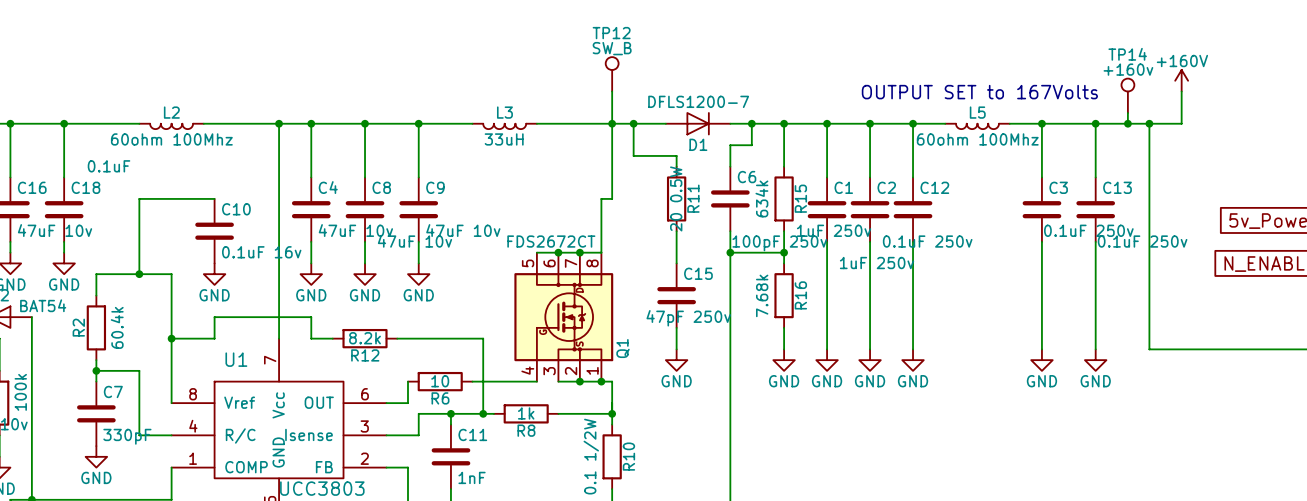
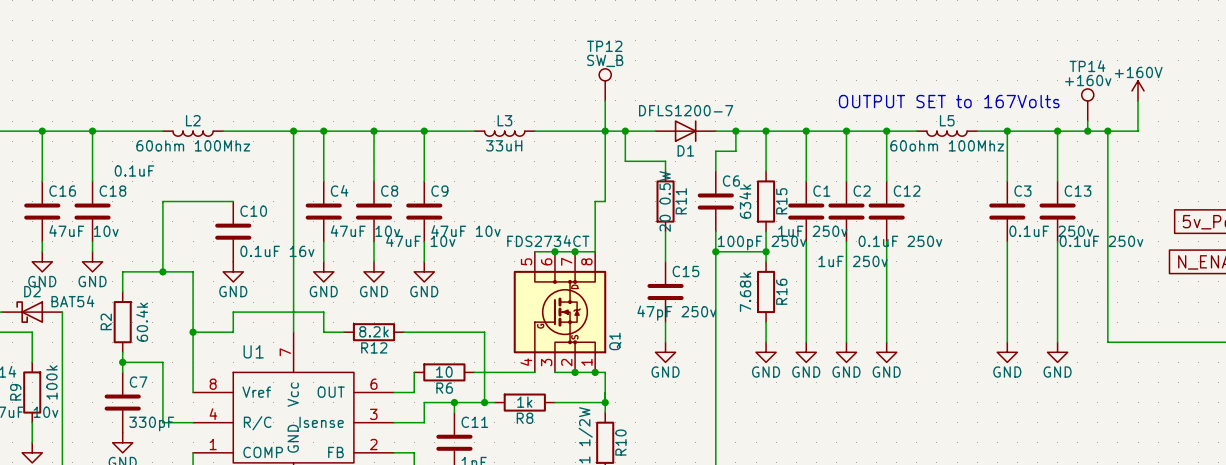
Q1 value: FDS2672CT (551, 241) -> FDS2734CT (548, 241)

